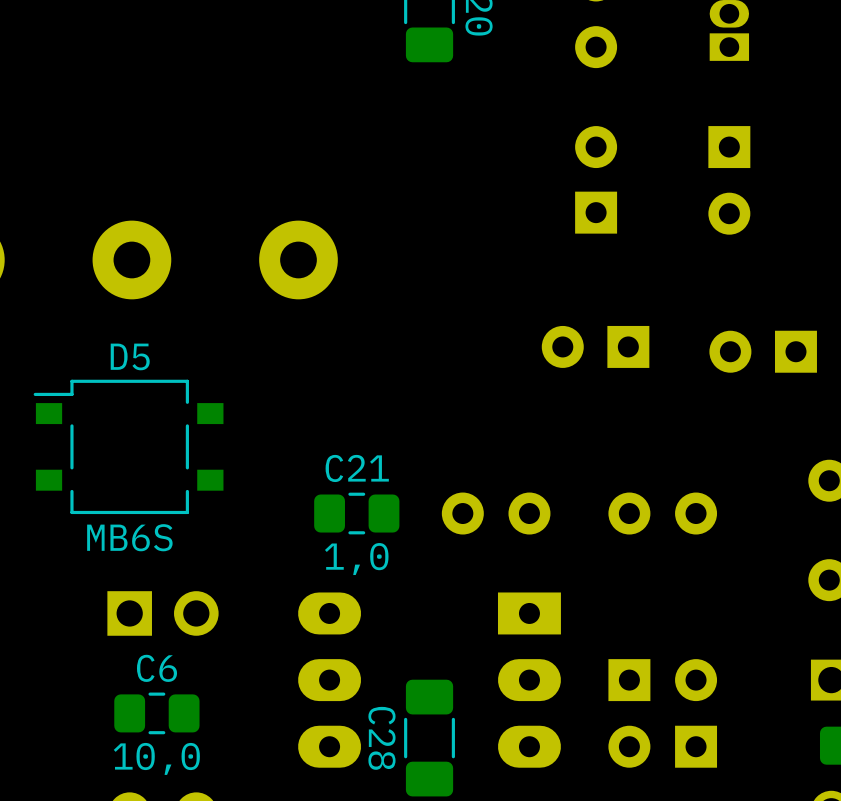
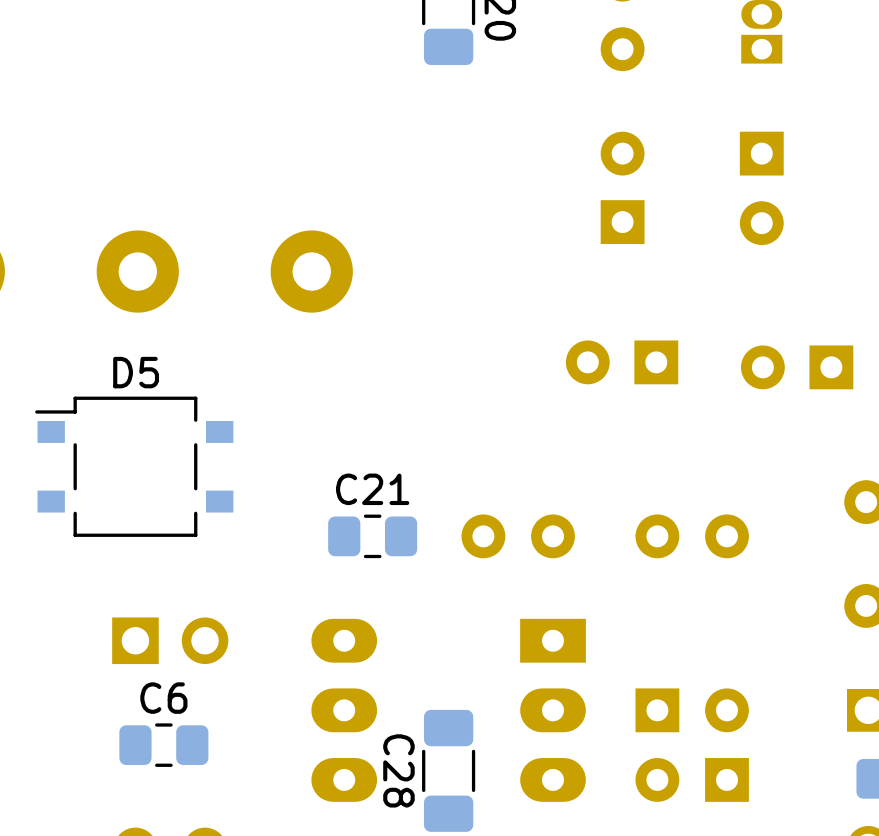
D5 value: MB6S (129, 537) -> none
C21 value: 1,0 (356, 559) -> none
C6 value: 10,0 (156, 758) -> none

